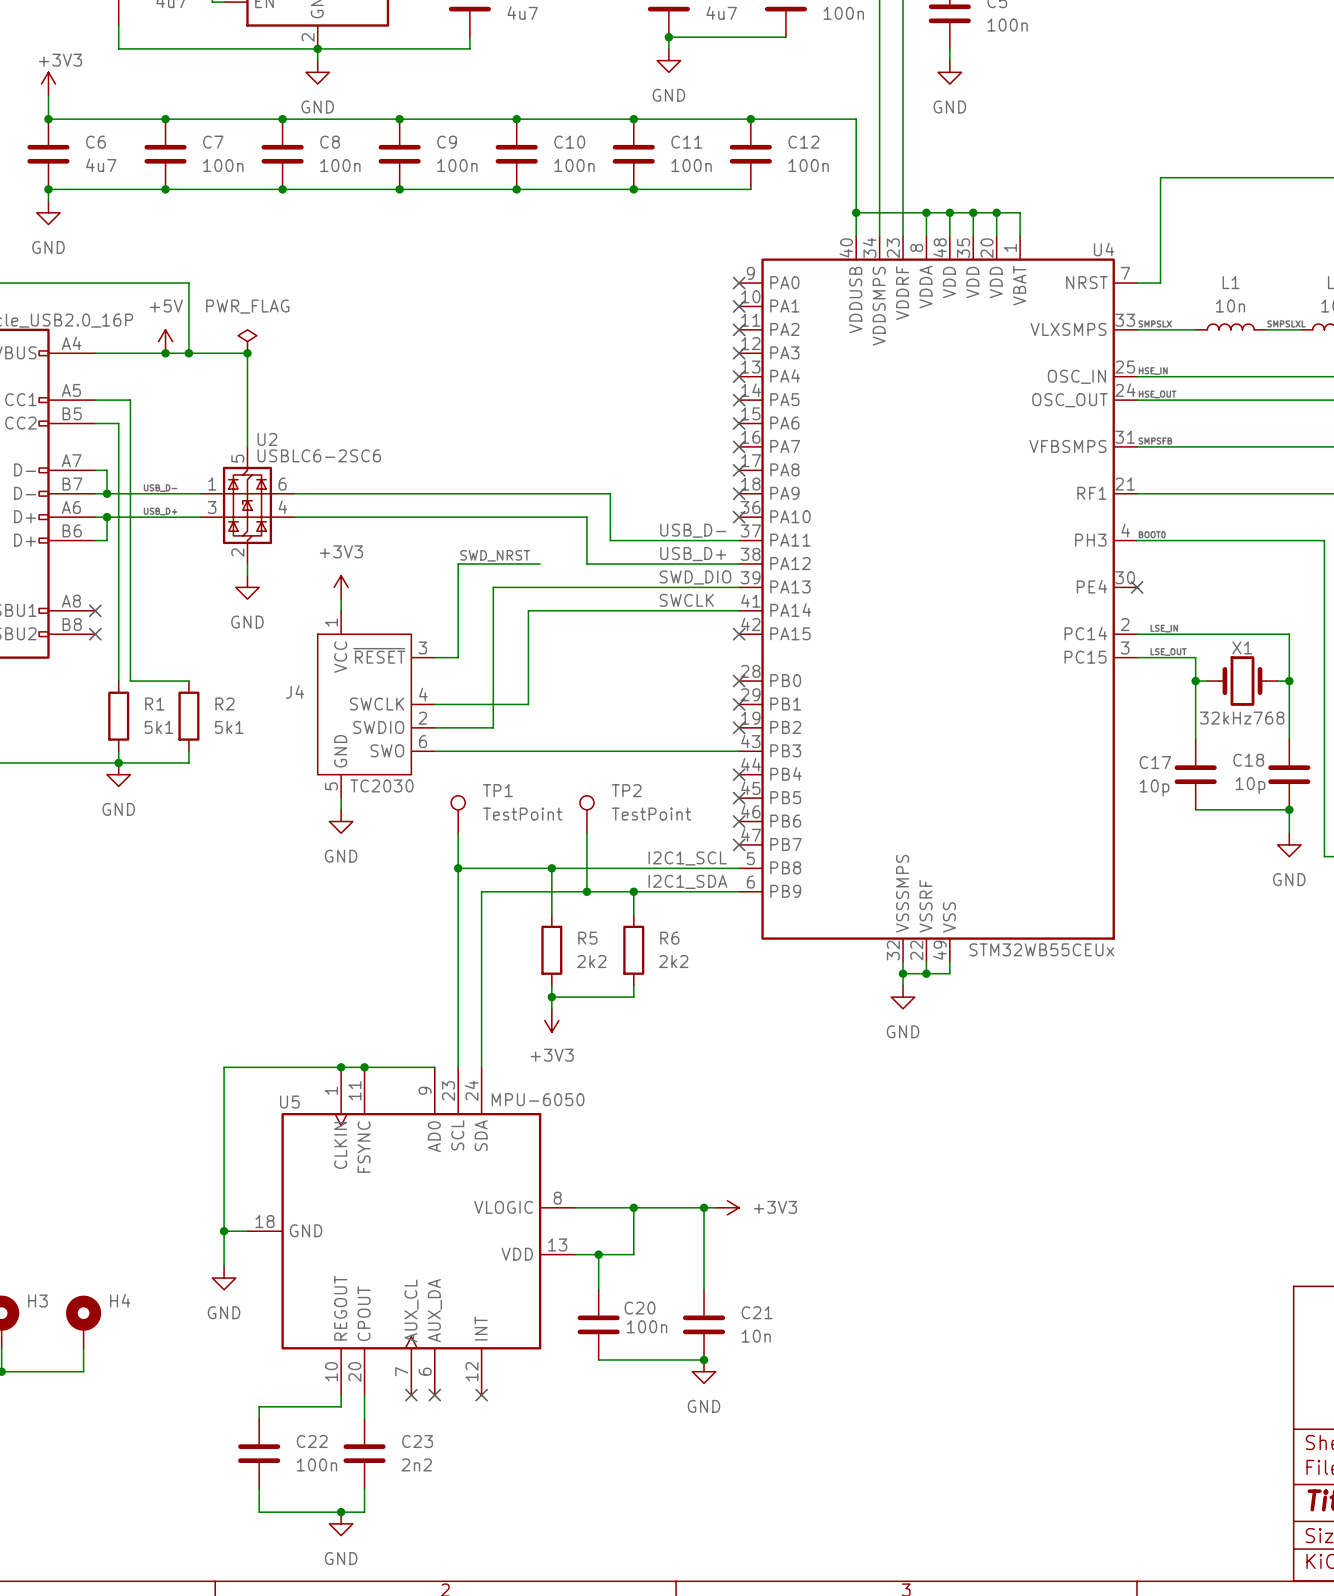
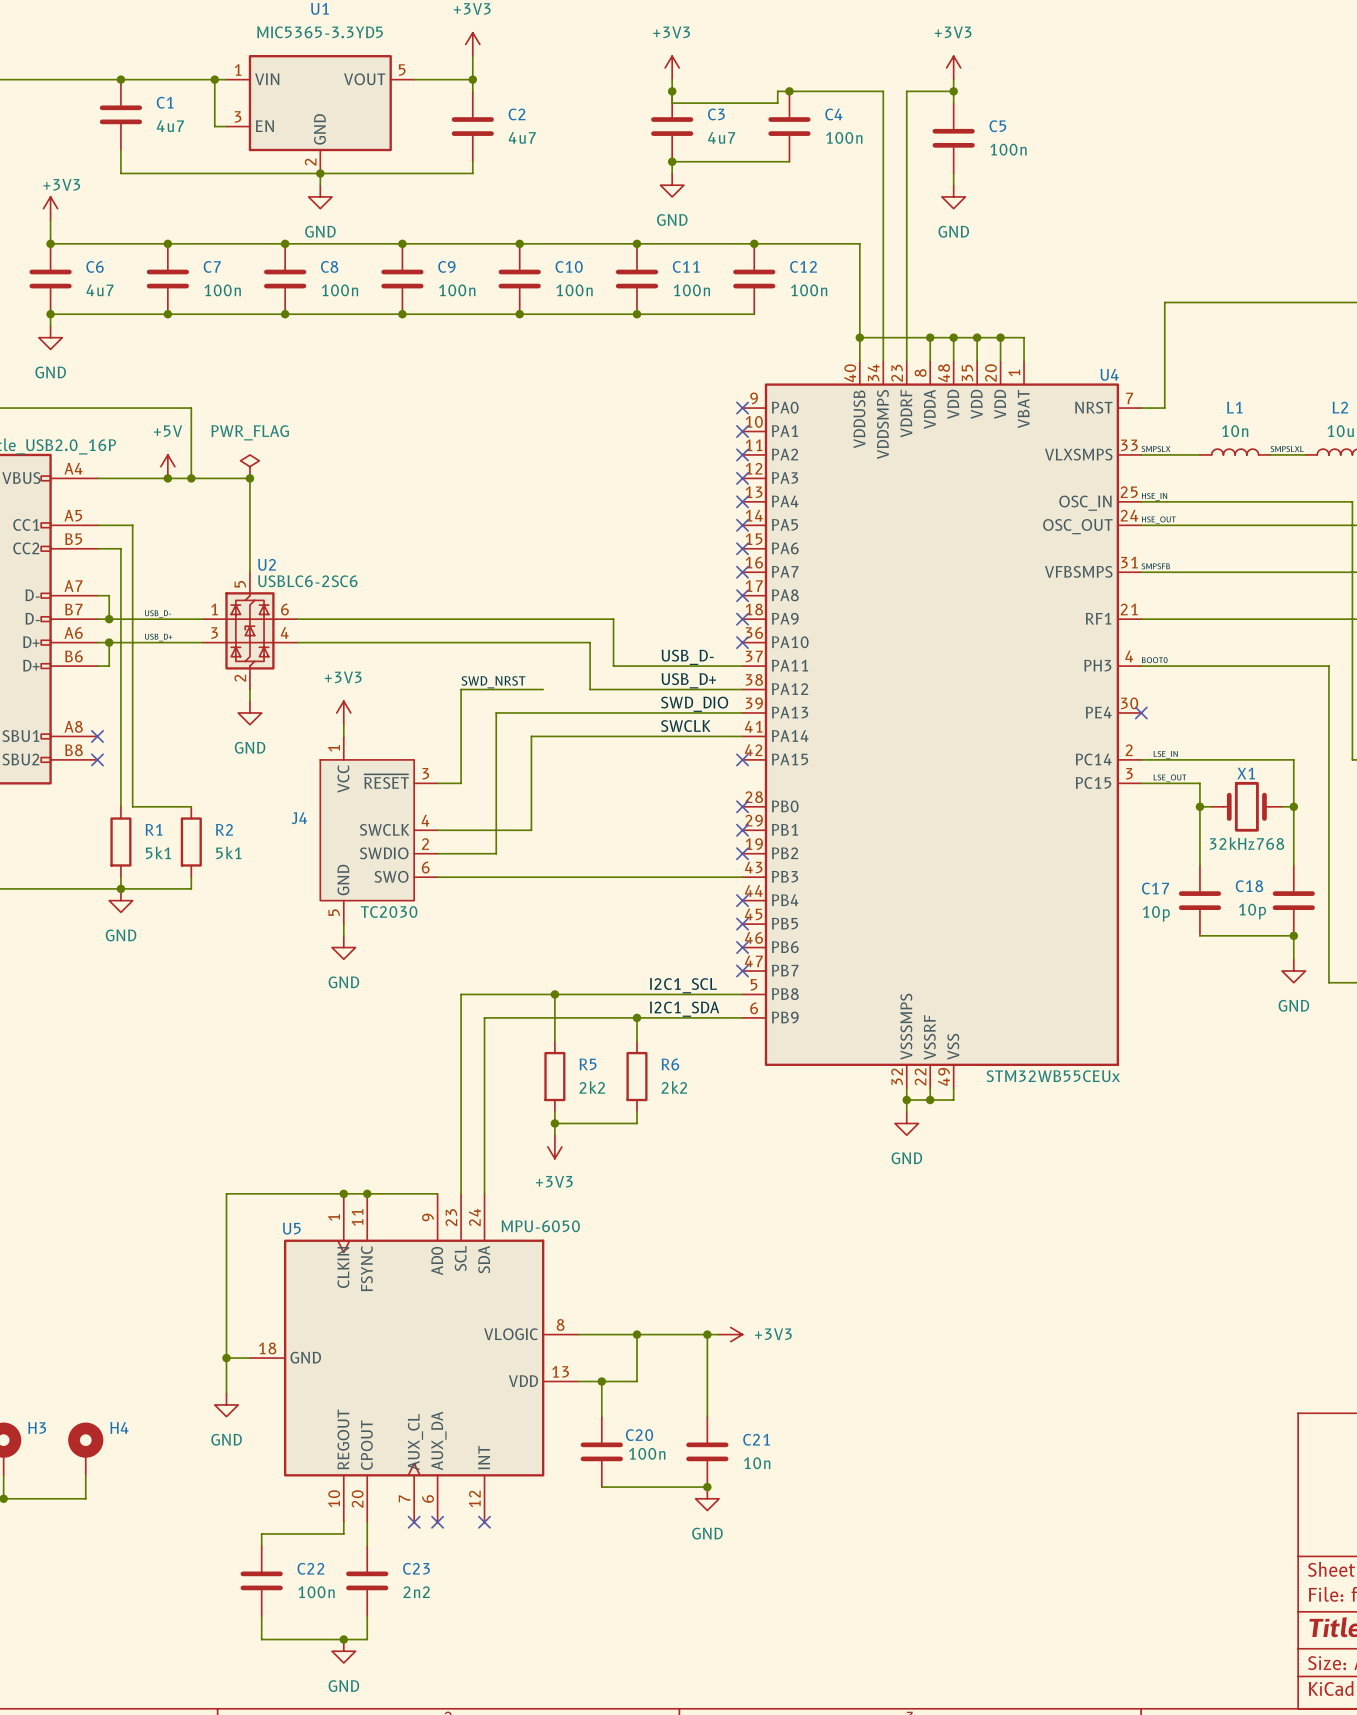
TP1: TestPoint (458, 814) -> none
TP2: TestPoint (586, 814) -> none
wire: (458, 833) (458, 868) -> none
wire: (586, 833) (586, 891) -> none
junction: (458, 868) -> none
junction: (586, 891) -> none

